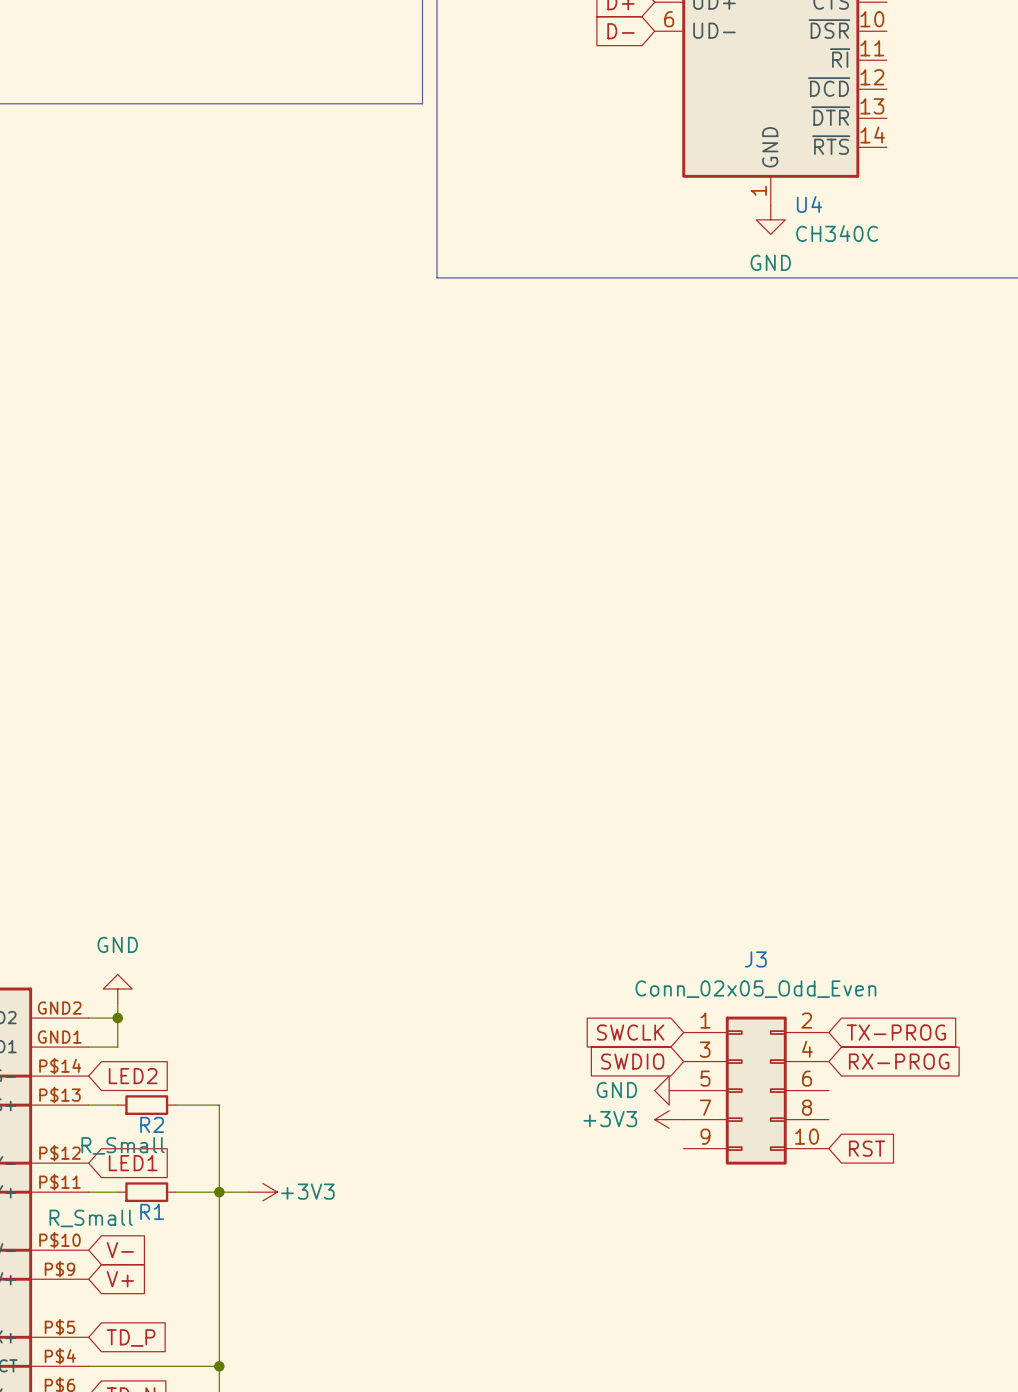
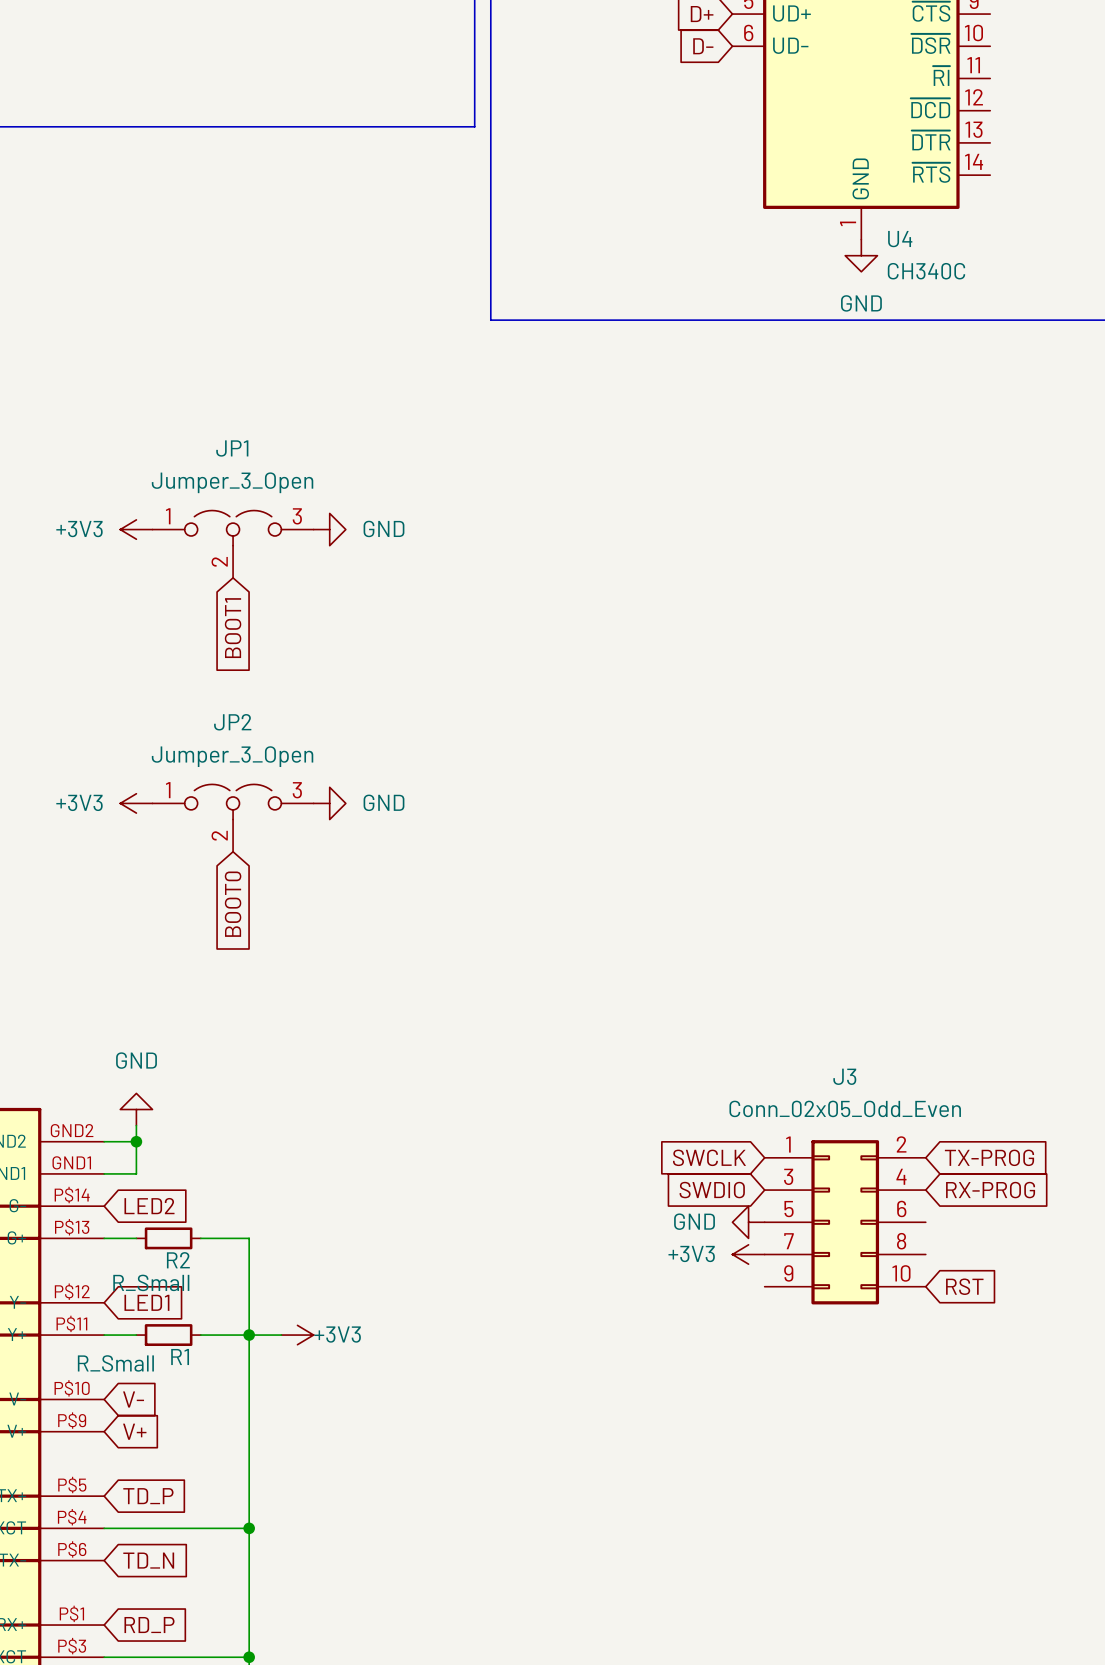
power symbol: none -> +3V3 (136, 529)
power symbol: none -> GND (329, 529)
JP1: none -> Jumper_3_Open (233, 544)
global label: none -> BOOT1 (233, 628)
power symbol: none -> +3V3 (136, 803)
power symbol: none -> GND (329, 803)
JP2: none -> Jumper_3_Open (233, 818)
global label: none -> BOOT0 (233, 904)

